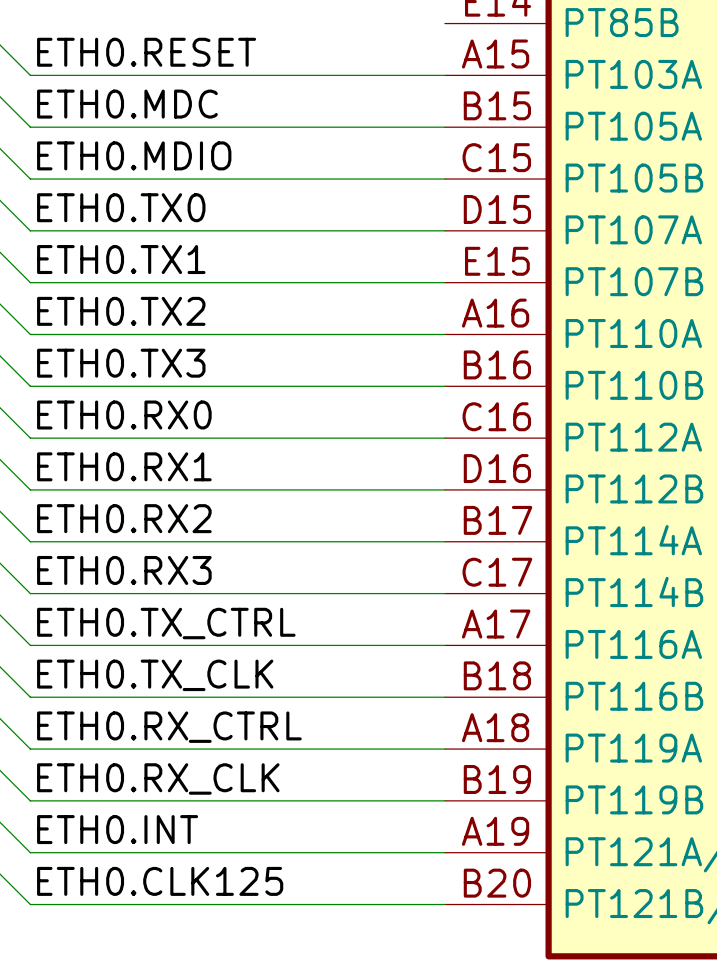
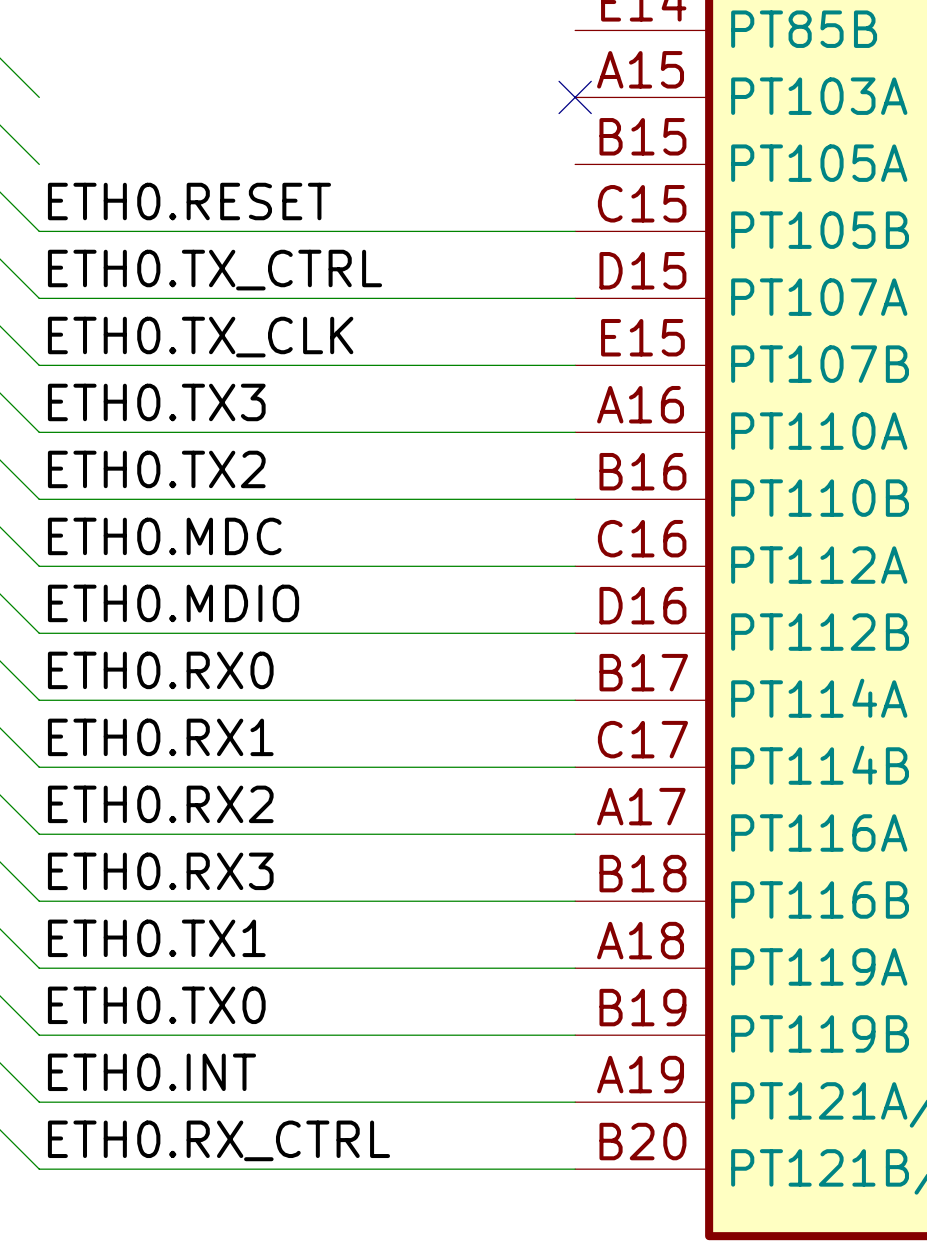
label: ETH0.RESET (146, 52) -> none
wire: (30, 75) (444, 75) -> none
no-connect mark: none -> (575, 97)
label: ETH0.MDC (127, 104) -> none
wire: (30, 127) (444, 127) -> none
label: ETH0.MDIO (134, 155) -> ETH0.RESET (189, 201)
label: ETH0.TX0 (121, 207) -> ETH0.TX_CTRL (214, 270)
label: ETH0.TX1 (121, 259) -> ETH0.TX_CLK (200, 337)
label: ETH0.TX2 (121, 311) -> ETH0.TX3 (156, 402)
label: ETH0.TX3 (121, 363) -> ETH0.TX2 (156, 469)
label: ETH0.RX0 (124, 415) -> ETH0.MDC (164, 536)
label: ETH0.RX1 (124, 466) -> ETH0.MDIO (173, 603)
label: ETH0.RX2 (124, 518) -> ETH0.RX0 (160, 670)
label: ETH0.RX3 (124, 570) -> ETH0.RX1 (160, 737)
label: ETH0.TX_CTRL (166, 623) -> ETH0.RX2 (160, 804)
label: ETH0.TX_CLK (155, 675) -> ETH0.RX3 (160, 871)
label: ETH0.RX_CTRL (169, 727) -> ETH0.TX1 (156, 938)
label: ETH0.RX_CLK (158, 778) -> ETH0.TX0 (156, 1005)
label: ETH0.CLK125 (160, 881) -> ETH0.RX_CTRL (218, 1140)

